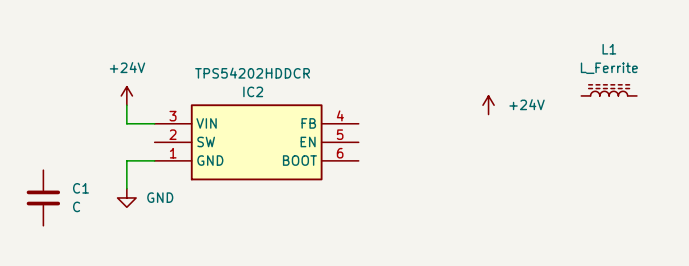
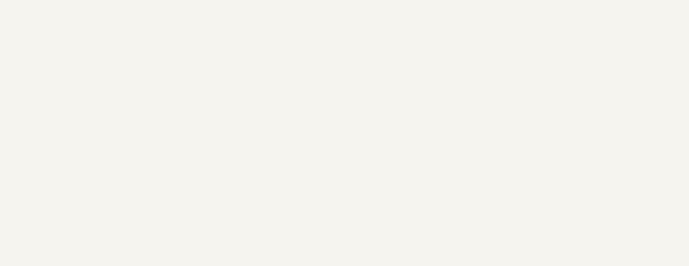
L1: L_Ferrite (609, 90) -> none
power symbol: +24V (126, 95) -> none
wire: (126, 105) (126, 123) (154, 123) -> none
power symbol: +24V (488, 105) -> none
IC2: TPS54202HDDCR (256, 142) -> none
wire: (154, 160) (126, 160) (126, 188) -> none
C1: C (43, 197) -> none
power symbol: GND (126, 197) -> none

